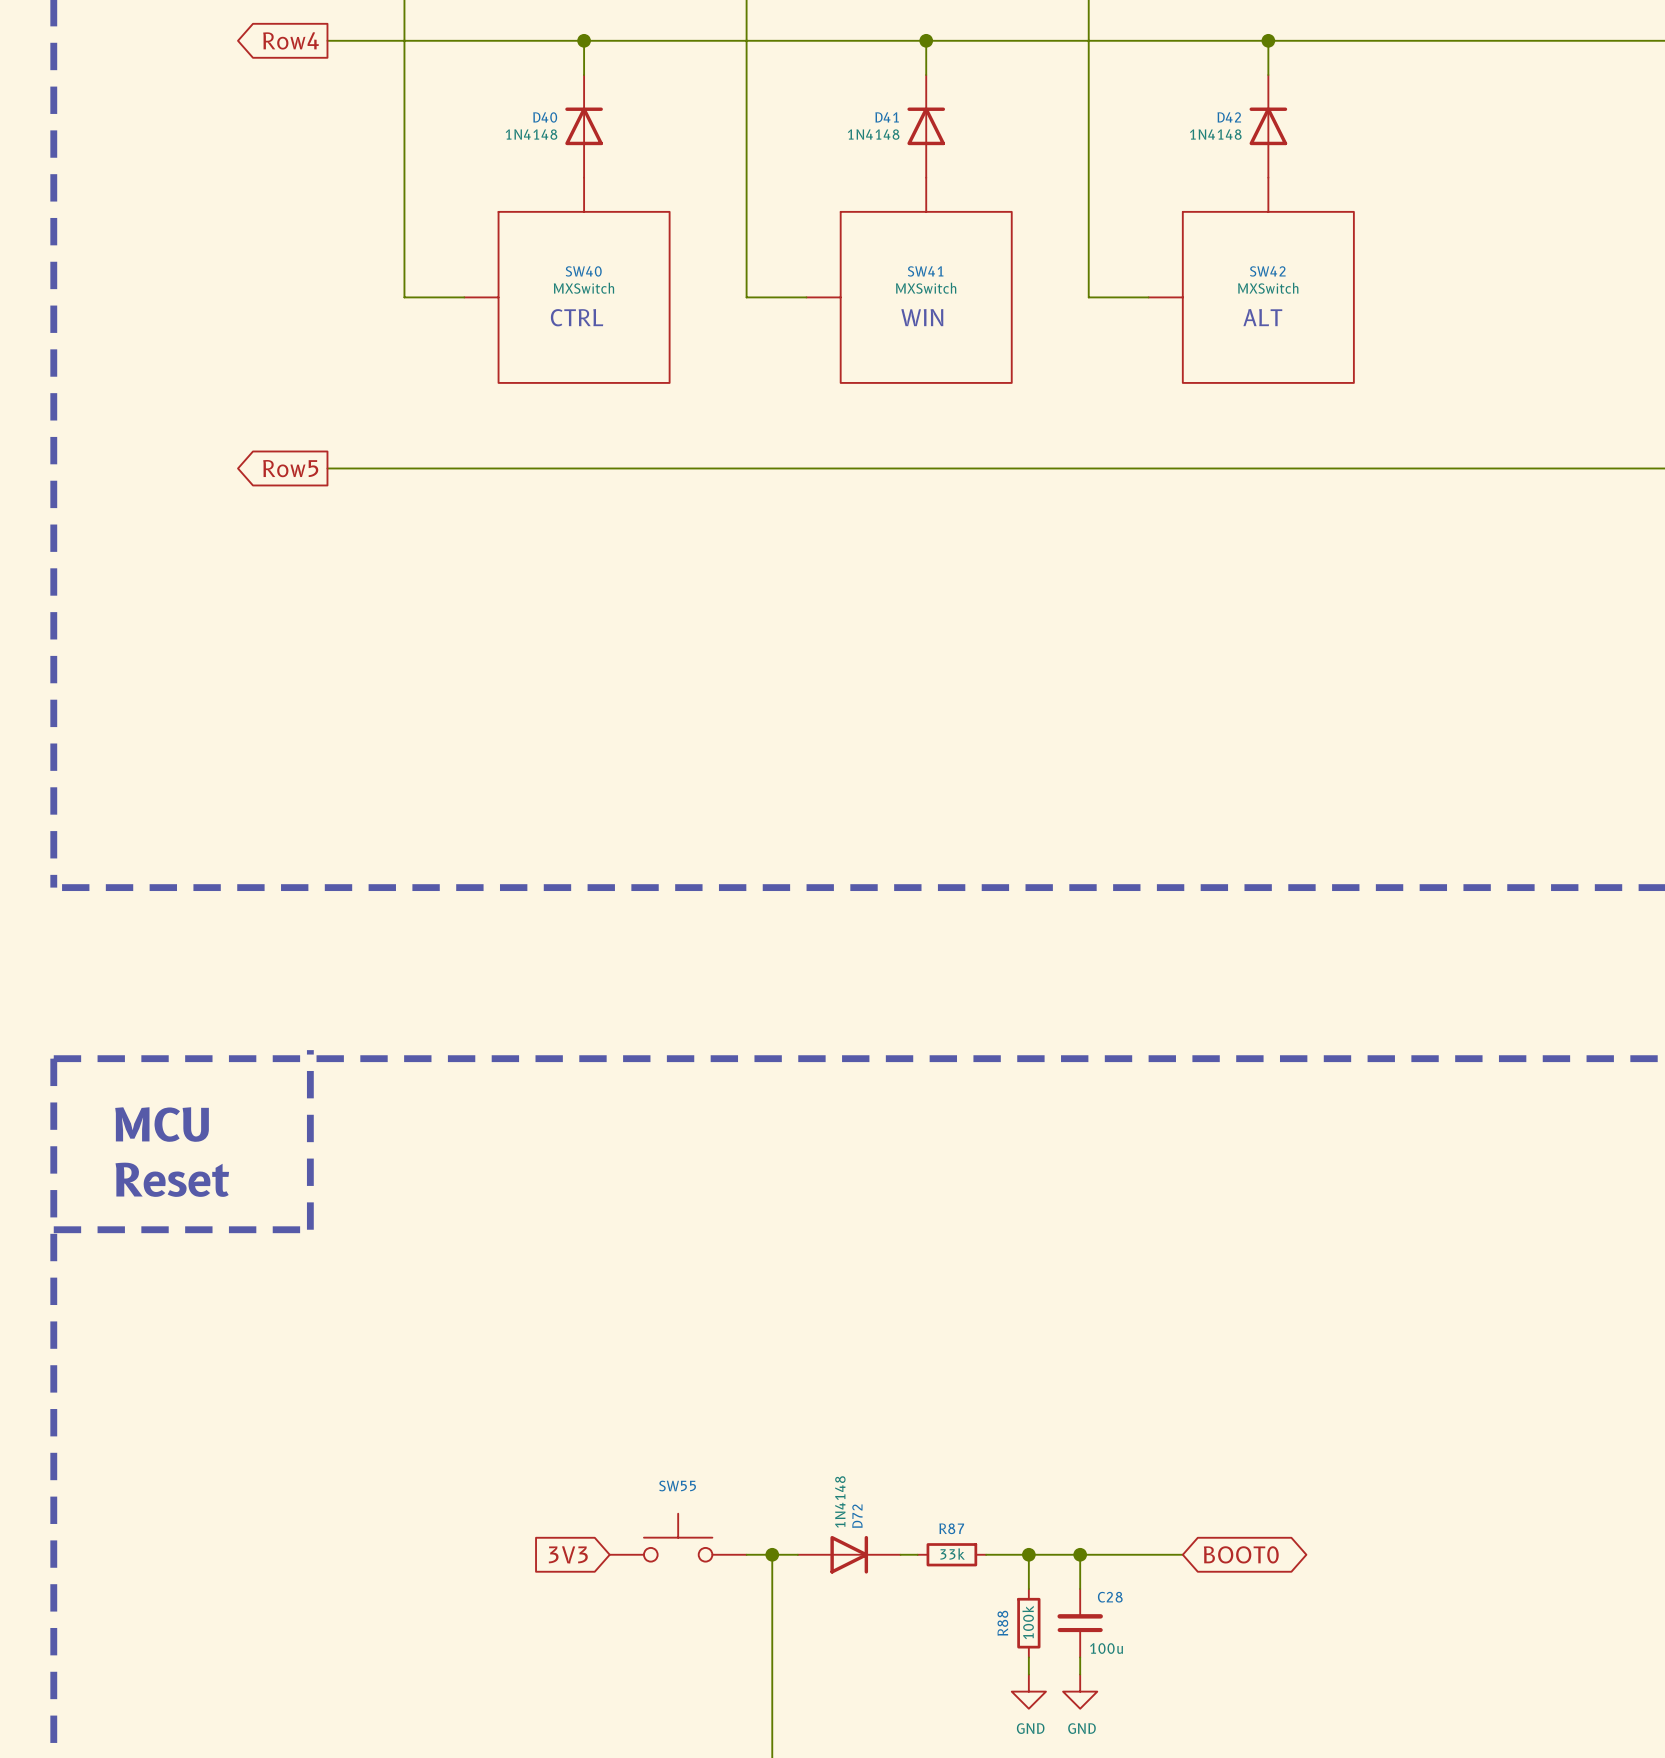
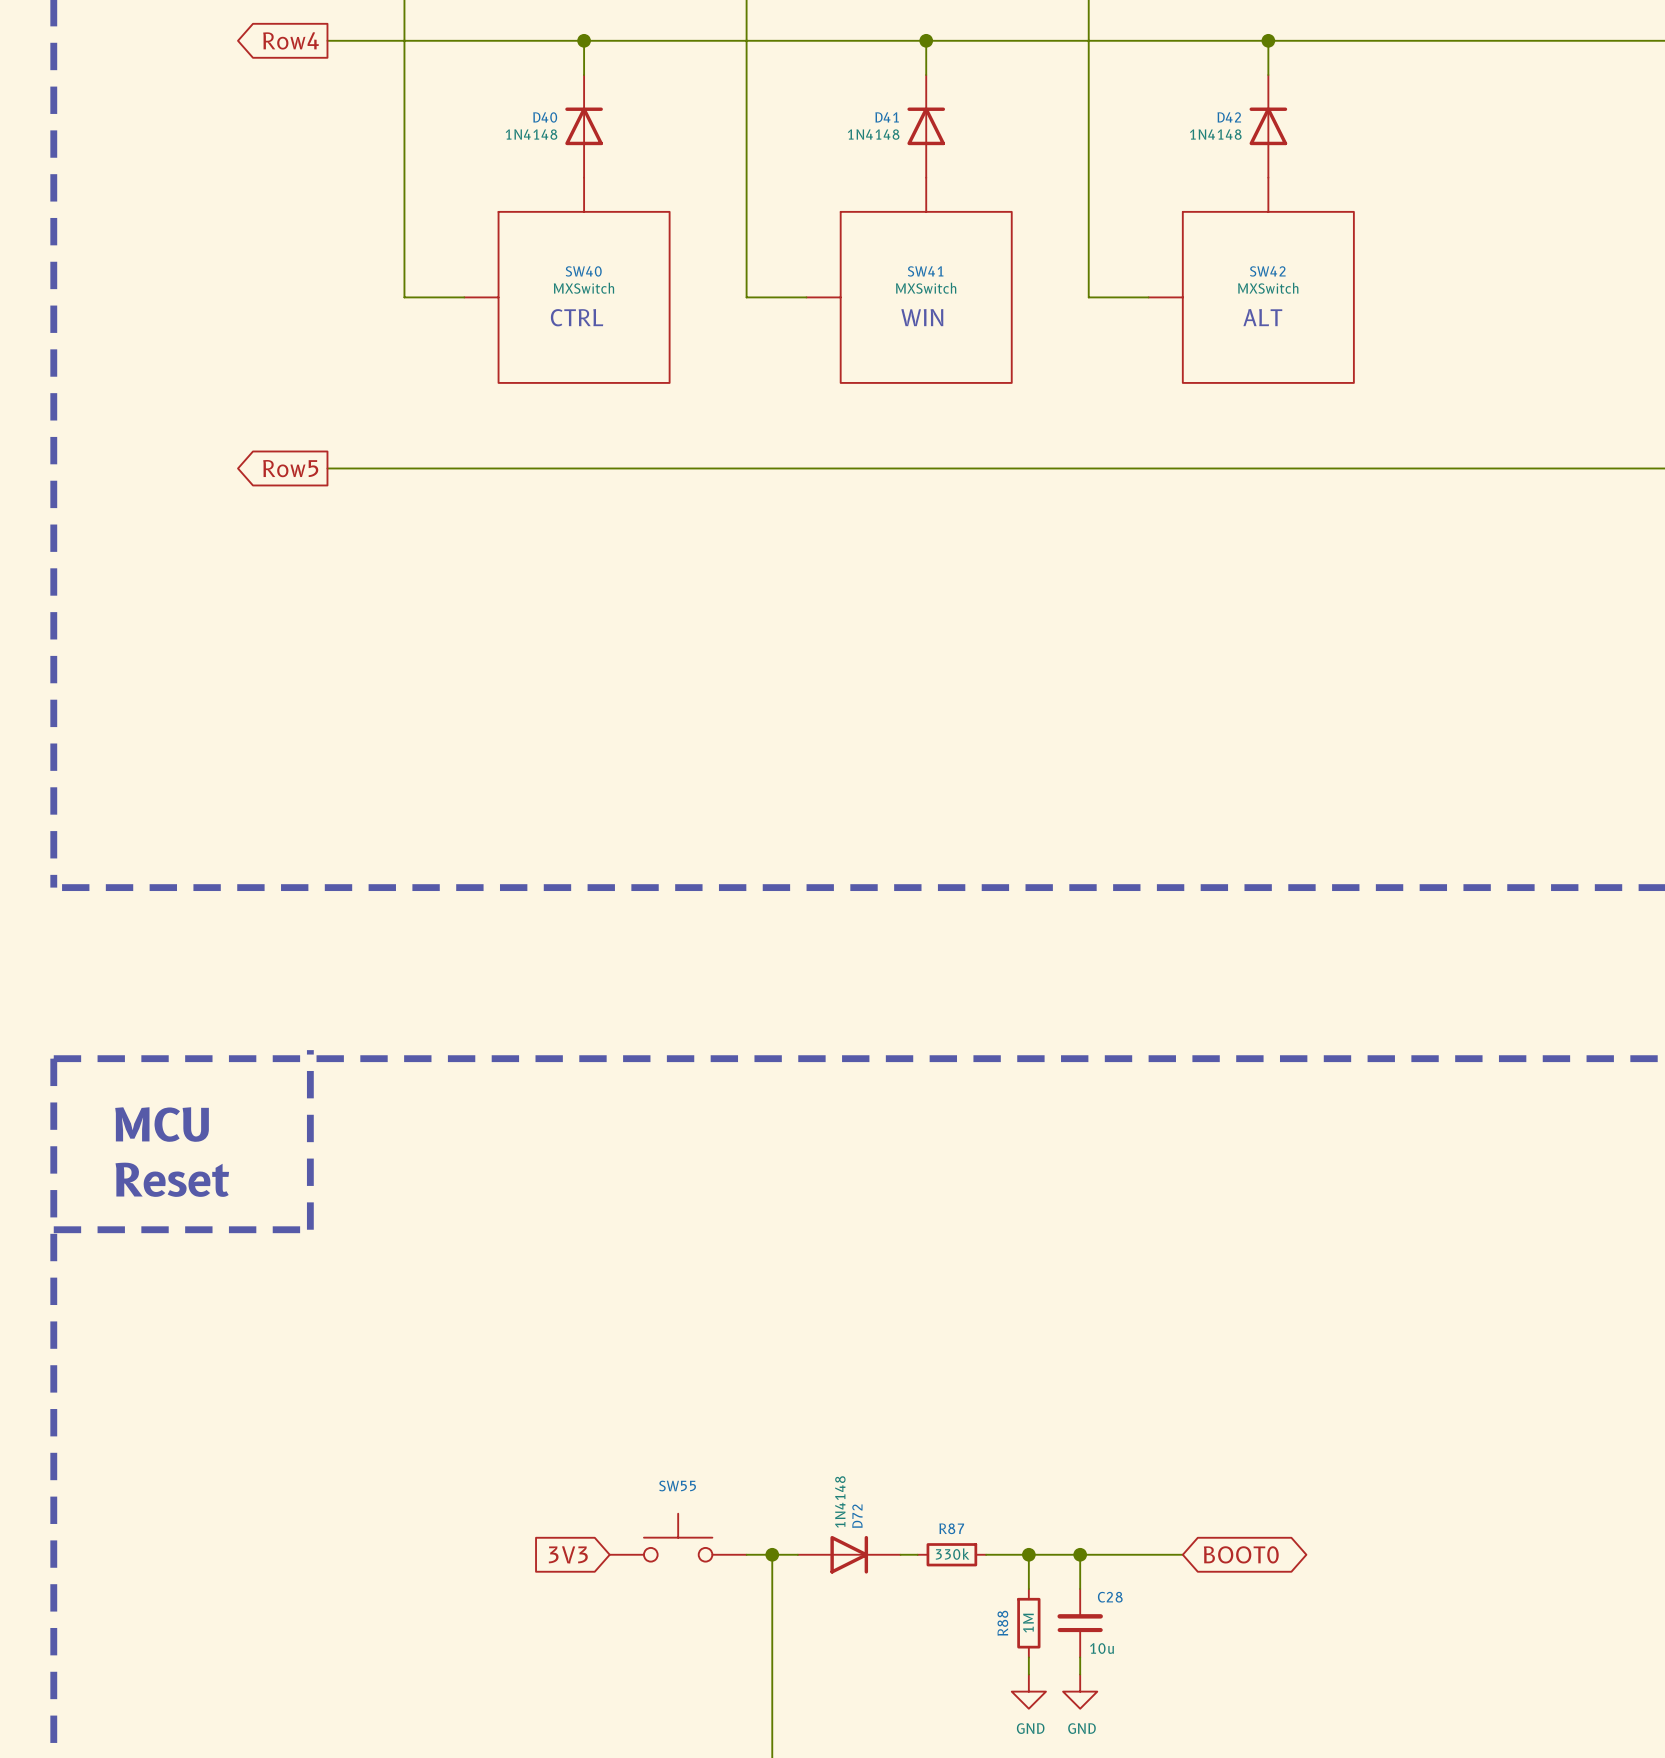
R87 value: 33k (952, 1554) -> 330k (952, 1554)
R88 value: 100k (1028, 1622) -> 1M (1028, 1623)
C28 value: 100u (1106, 1648) -> 10u (1101, 1648)

